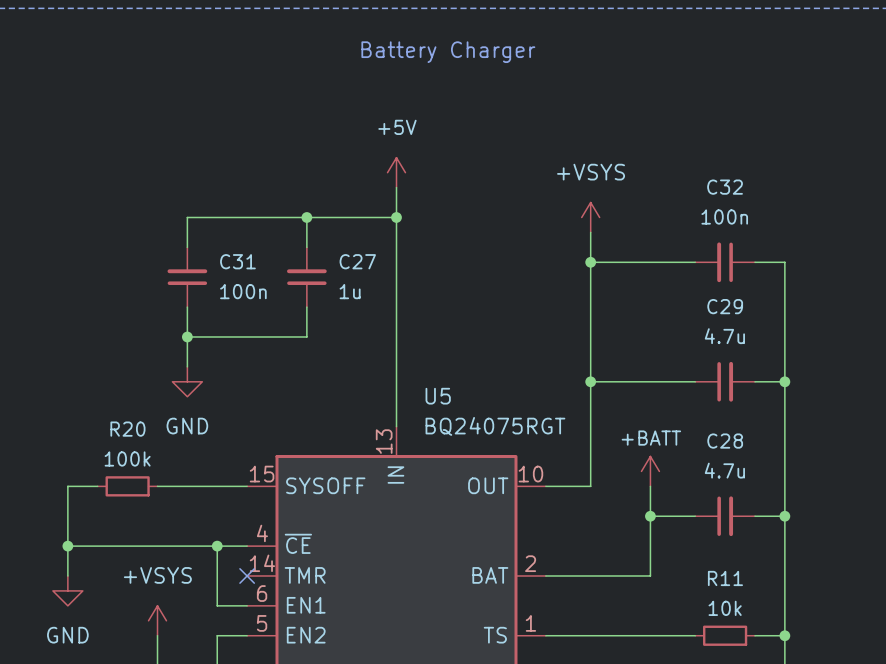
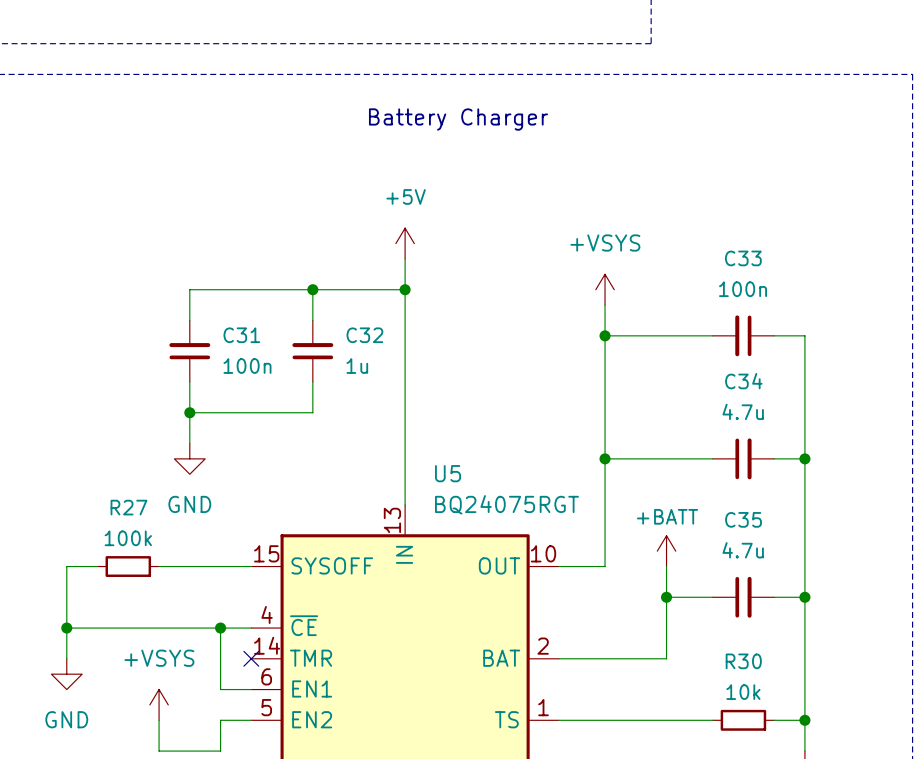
C32 name: C32 (725, 187) -> C33 (743, 258)
C27 name: C27 (357, 261) -> C32 (364, 335)
C29 name: C29 (725, 306) -> C34 (743, 381)
R20 name: R20 (127, 429) -> R27 (128, 507)
C28 name: C28 (725, 441) -> C35 (743, 519)
R11 name: R11 (725, 578) -> R30 (743, 661)

